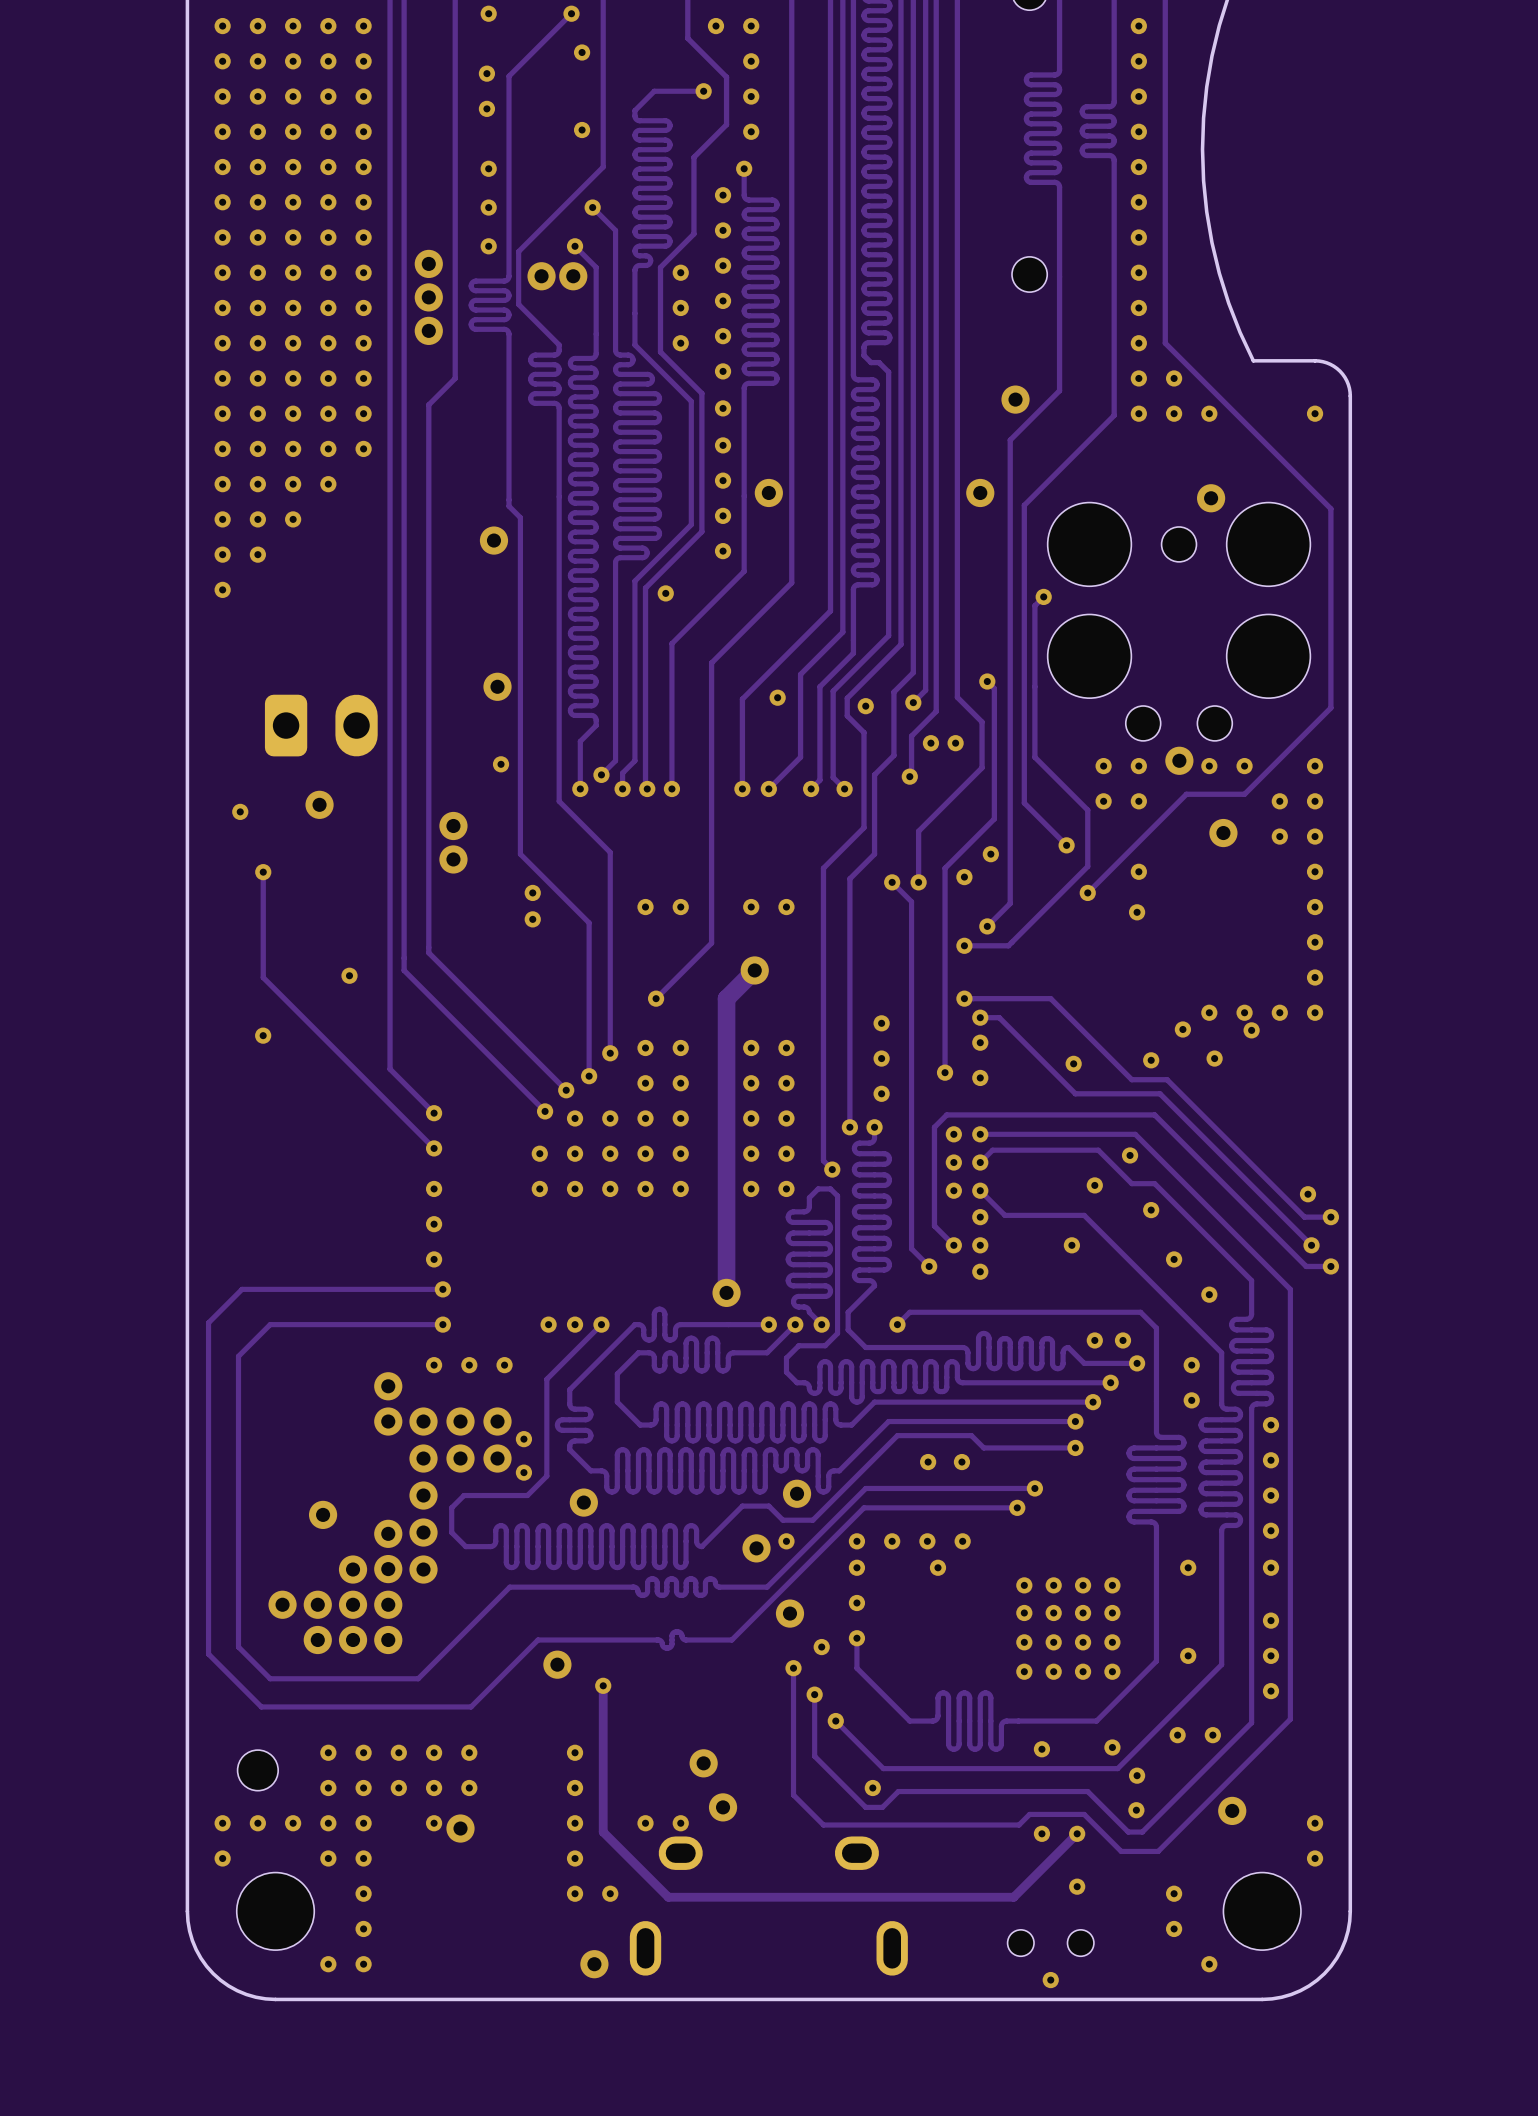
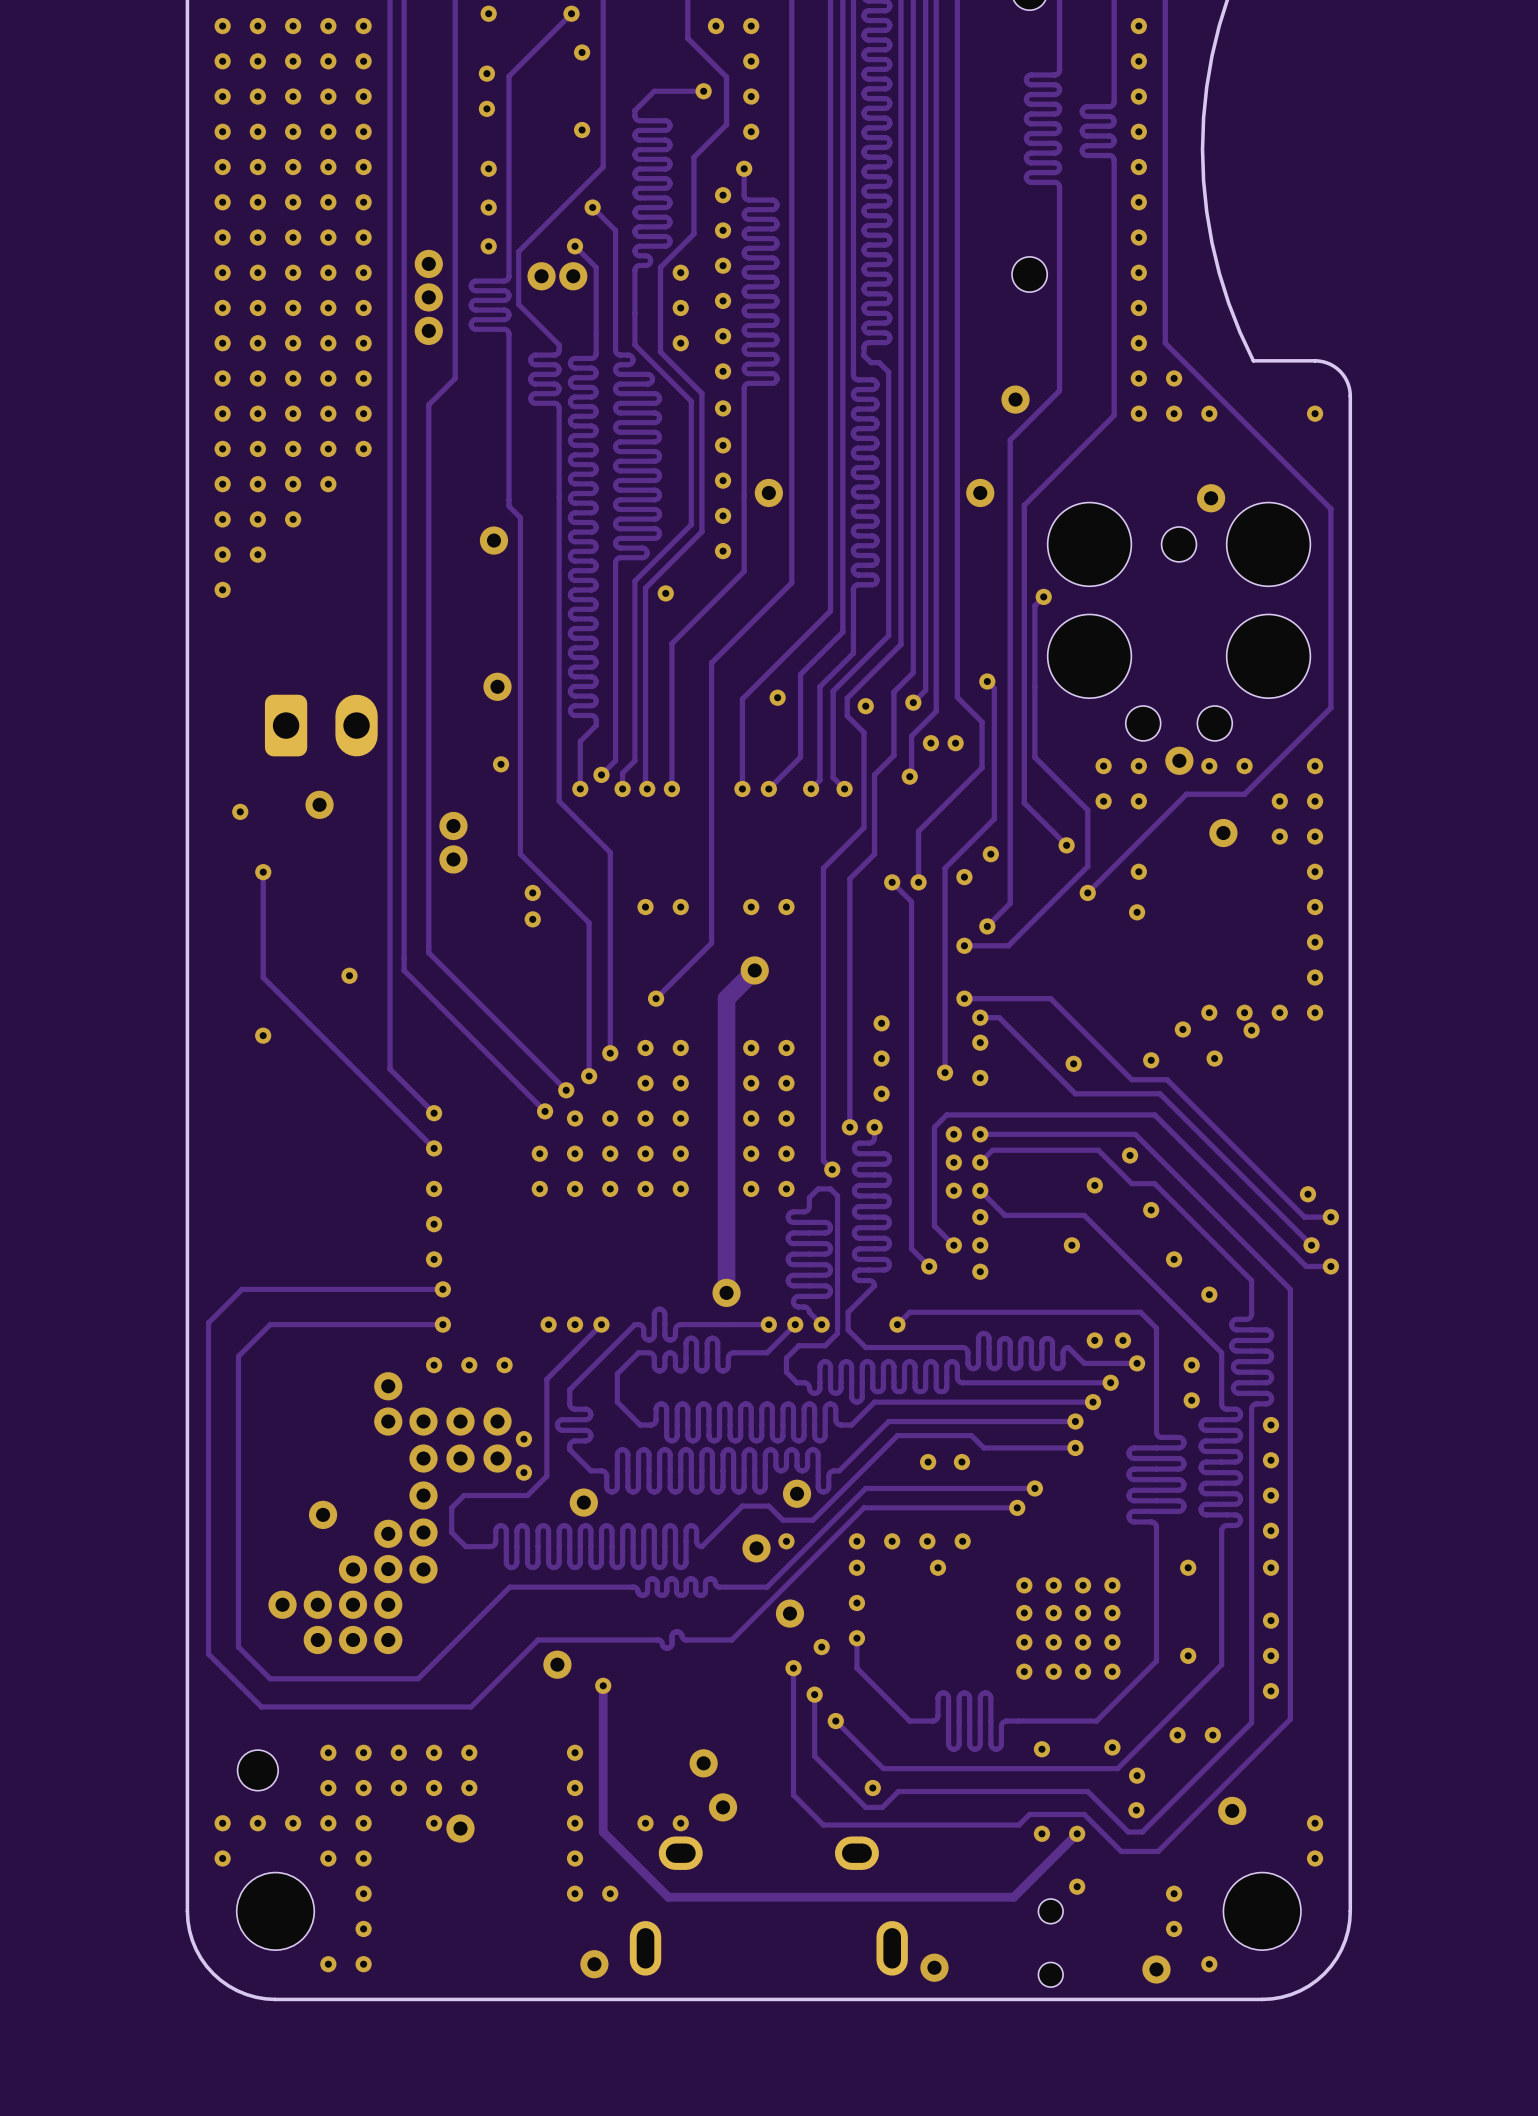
part footprint: [1007, 1929, 1094, 1957] -> [1038, 1899, 1064, 1988]
via: none -> (934, 1967)
via: none -> (1156, 1969)
via: (1050, 1980) -> none

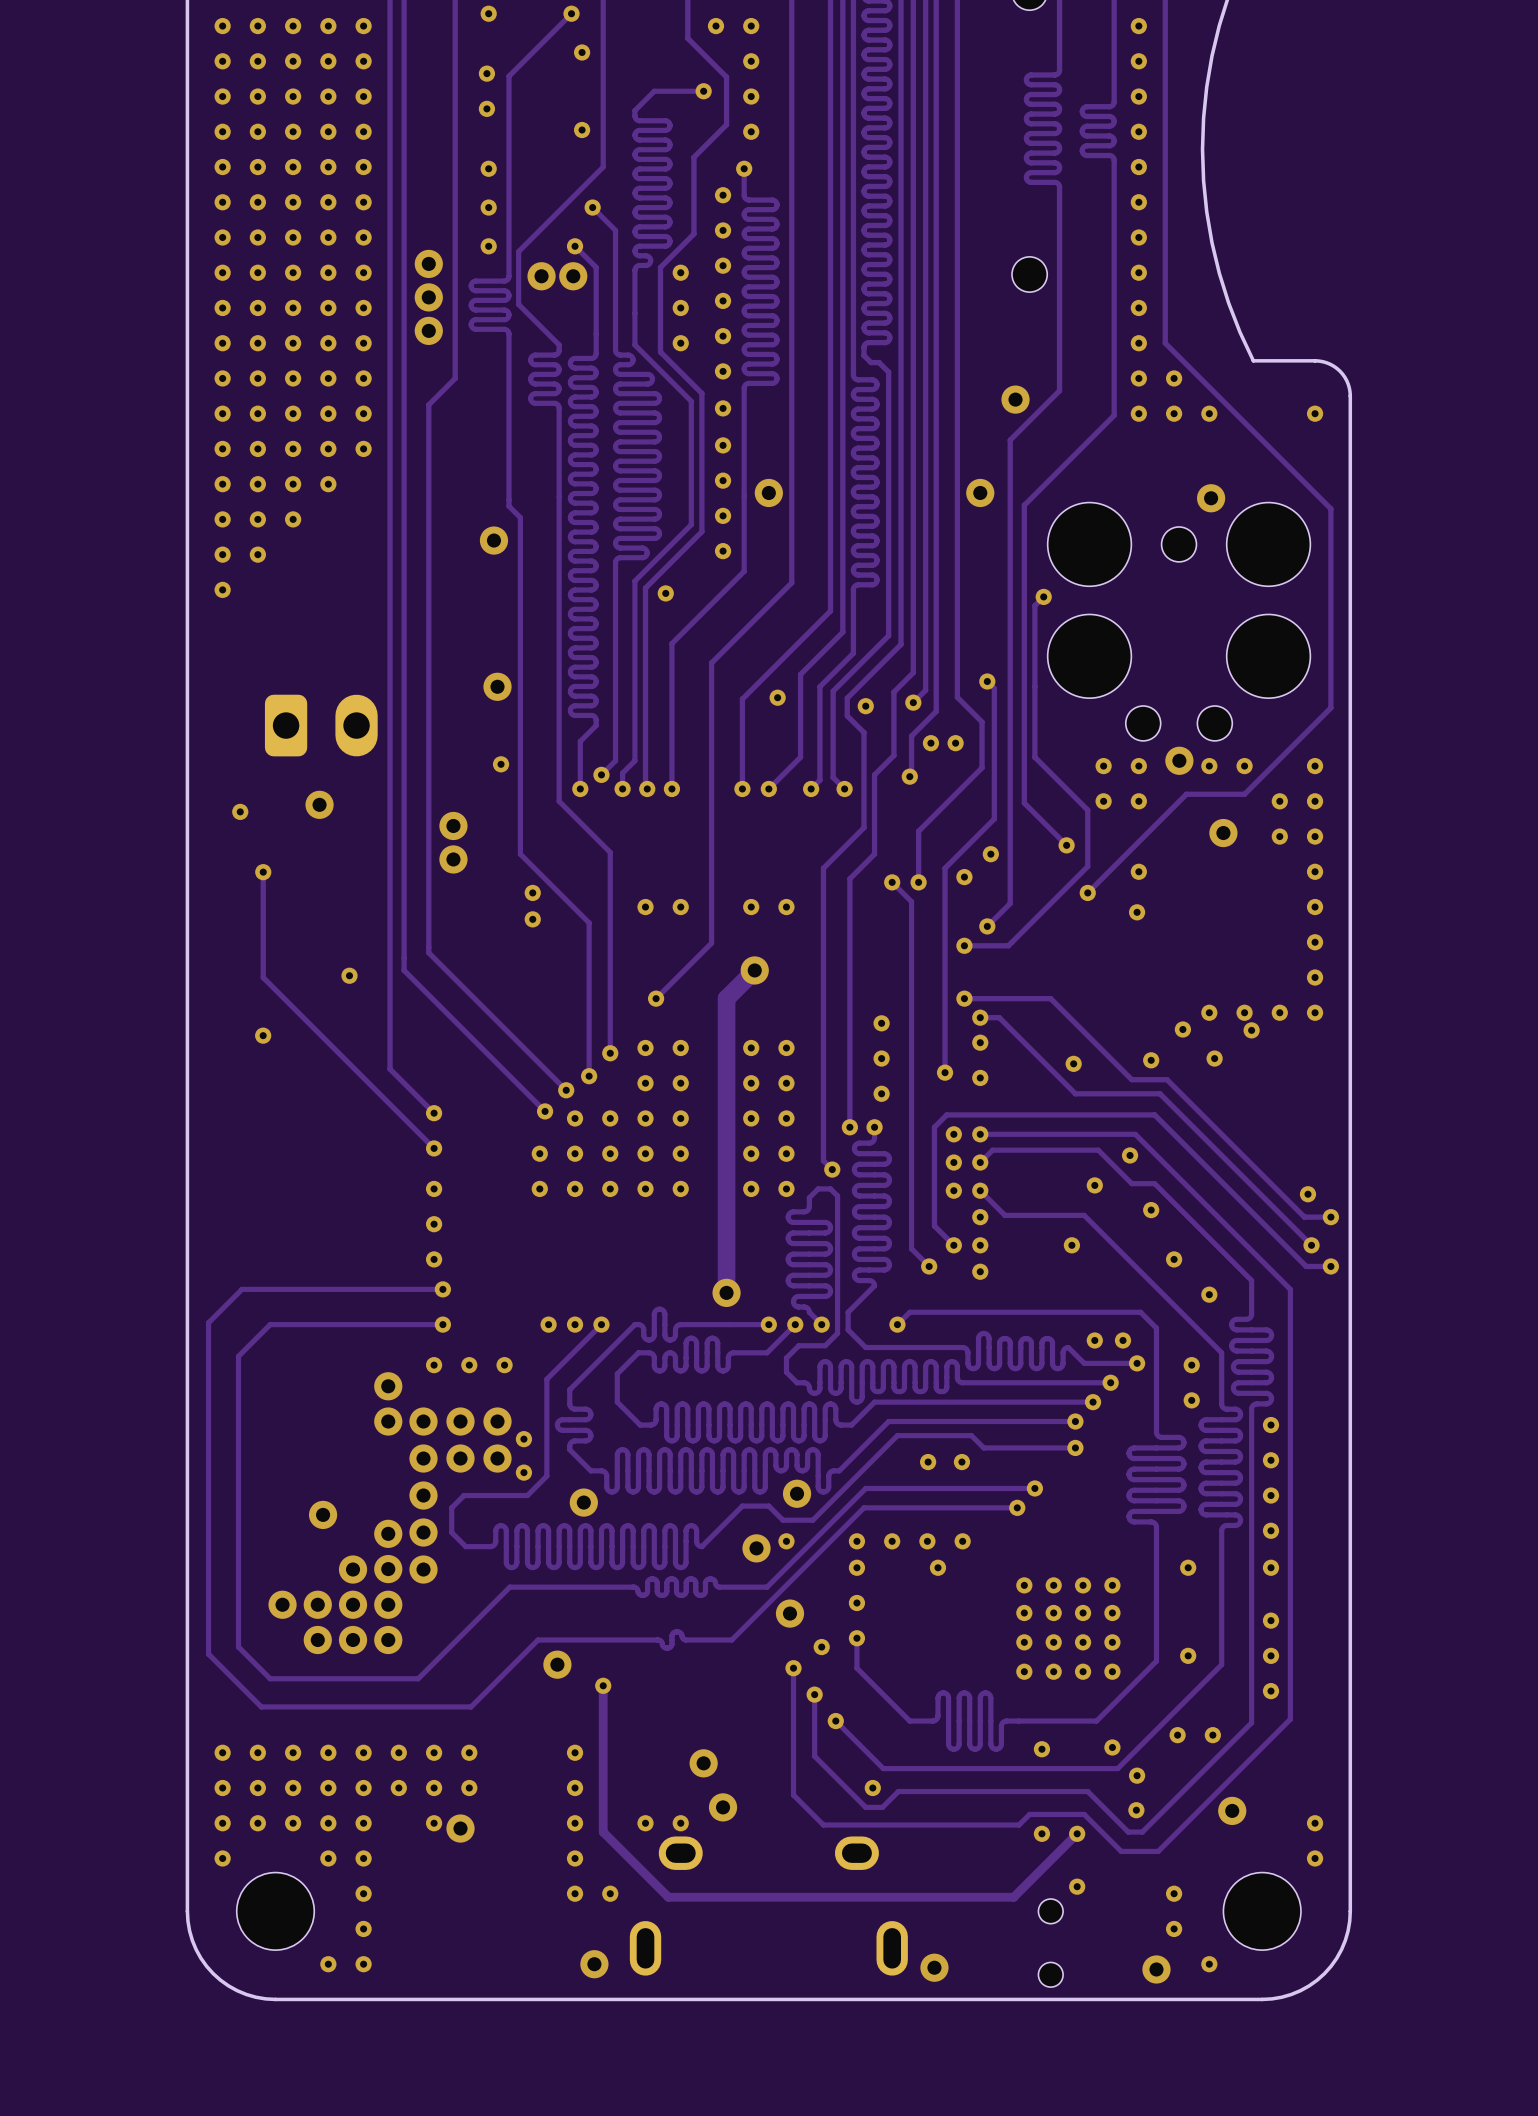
via: none -> (222, 1752)
via: none -> (257, 1752)
via: none -> (293, 1752)
part: (257, 1770) -> none
via: none -> (222, 1788)
via: none -> (257, 1788)
via: none -> (293, 1788)

